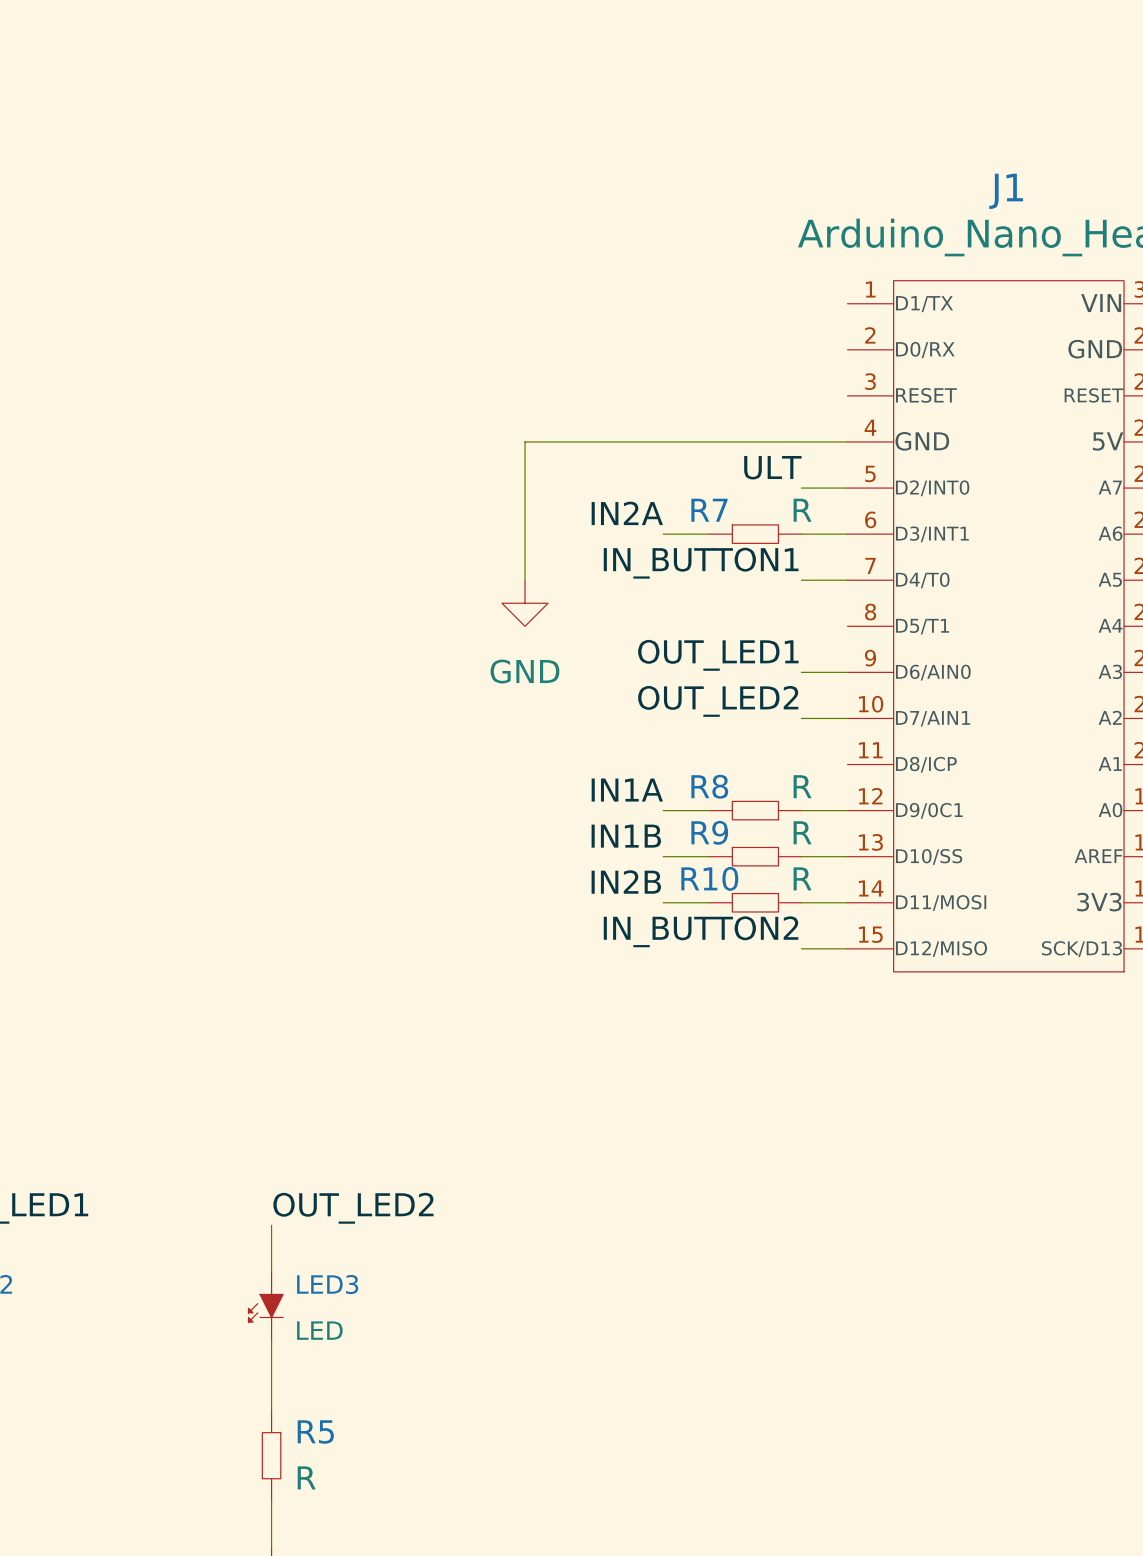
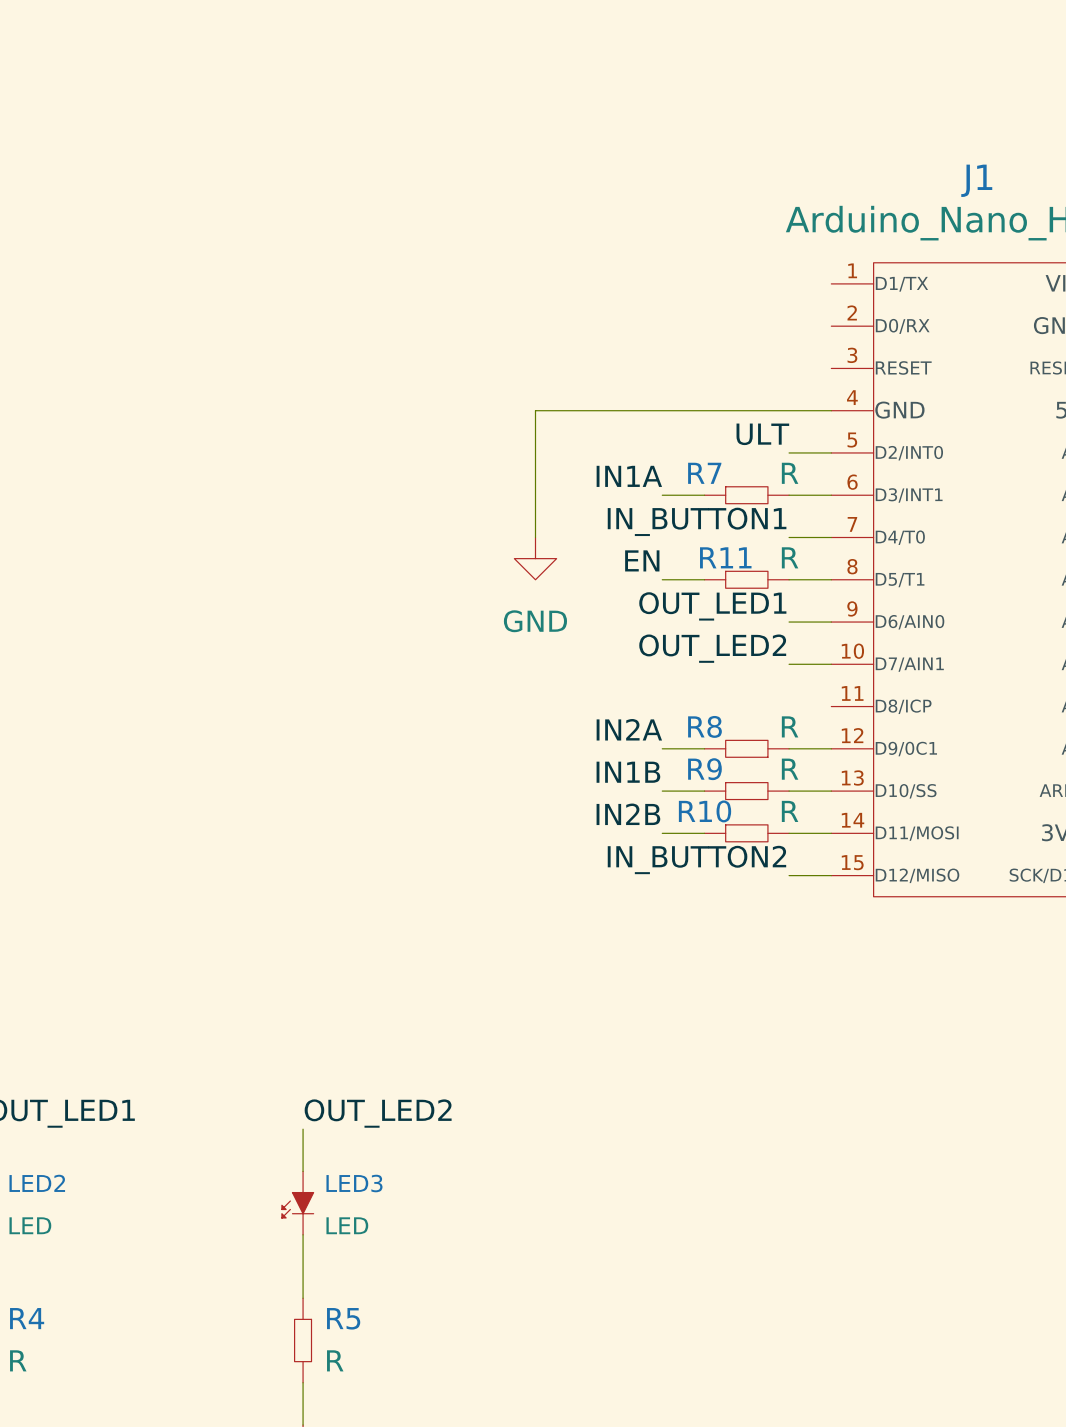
label: IN2A (627, 513) -> IN1A (629, 476)
label: none -> EN (642, 560)
wire: none -> (662, 579) (704, 579)
R11: none -> R (746, 579)
wire: none -> (789, 579) (831, 579)
label: IN1A (627, 790) -> IN2A (629, 729)

